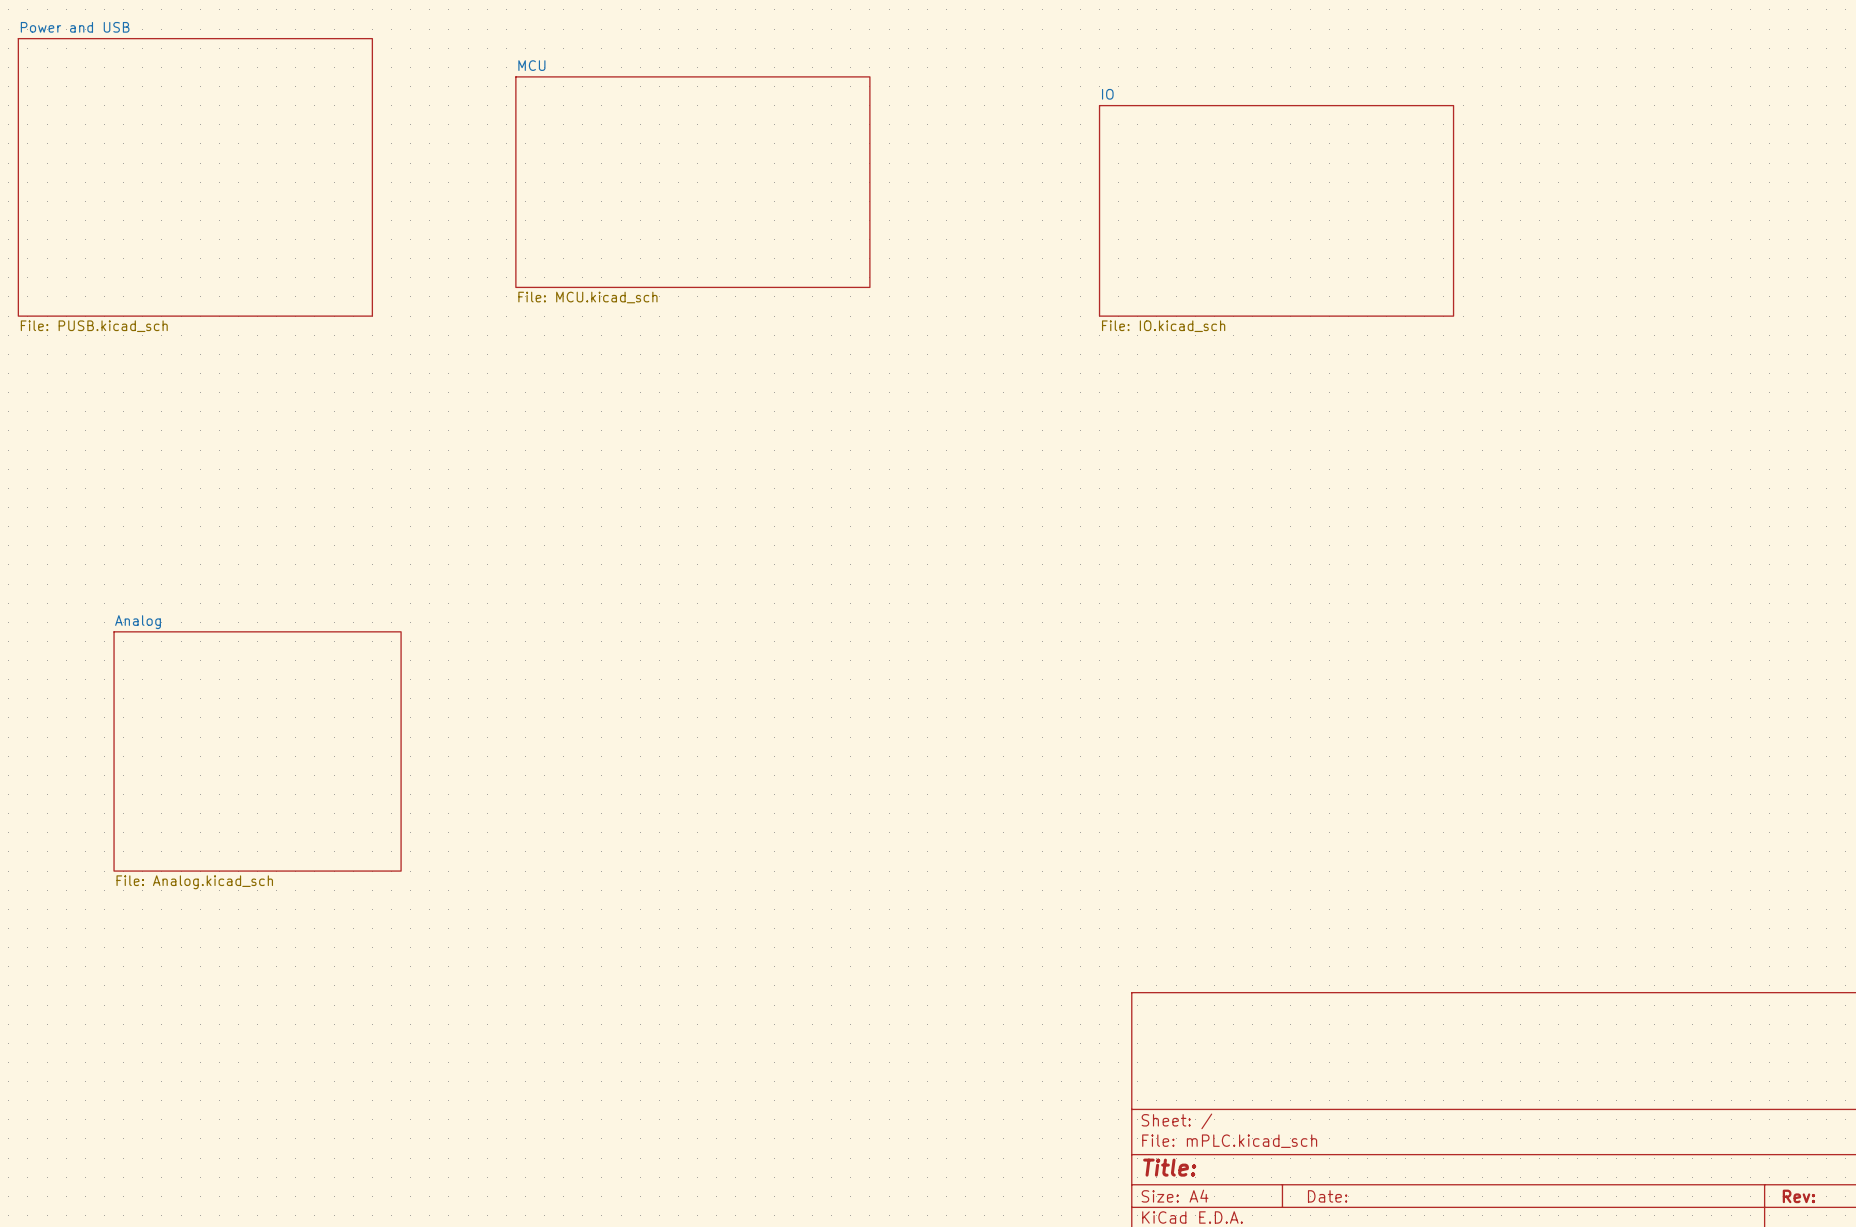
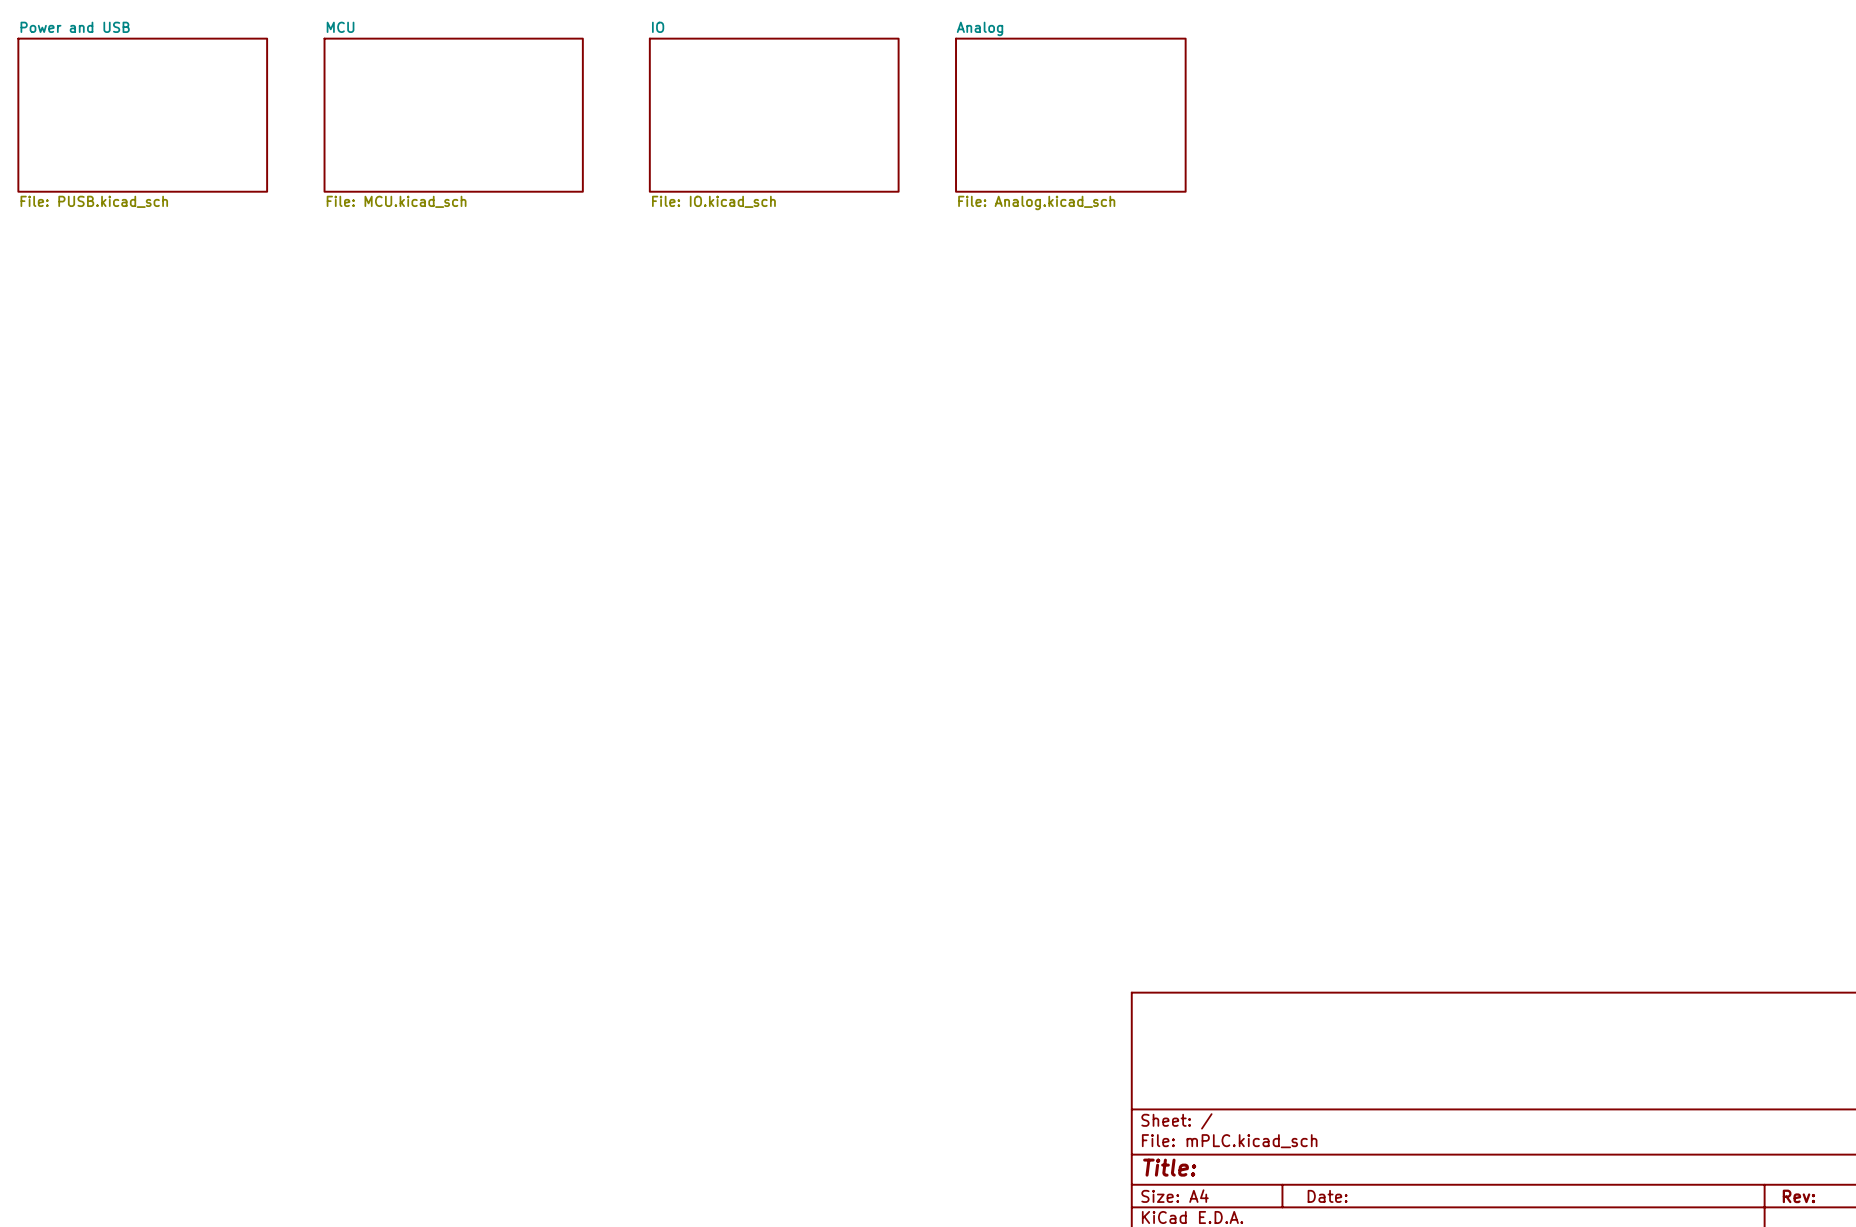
sheet Power and USB: none -> File: PUSB.kicad_sch (142, 115)
sheet MCU: none -> File: MCU.kicad_sch (453, 115)
sheet IO: none -> File: IO.kicad_sch (774, 115)
sheet Analog: none -> File: Analog.kicad_sch (1070, 115)
sheet Power and USB: File: PUSB.kicad_sch (195, 177) -> none
sheet MCU: File: MCU.kicad_sch (692, 182) -> none
sheet IO: File: IO.kicad_sch (1276, 210) -> none
sheet Analog: File: Analog.kicad_sch (257, 751) -> none

